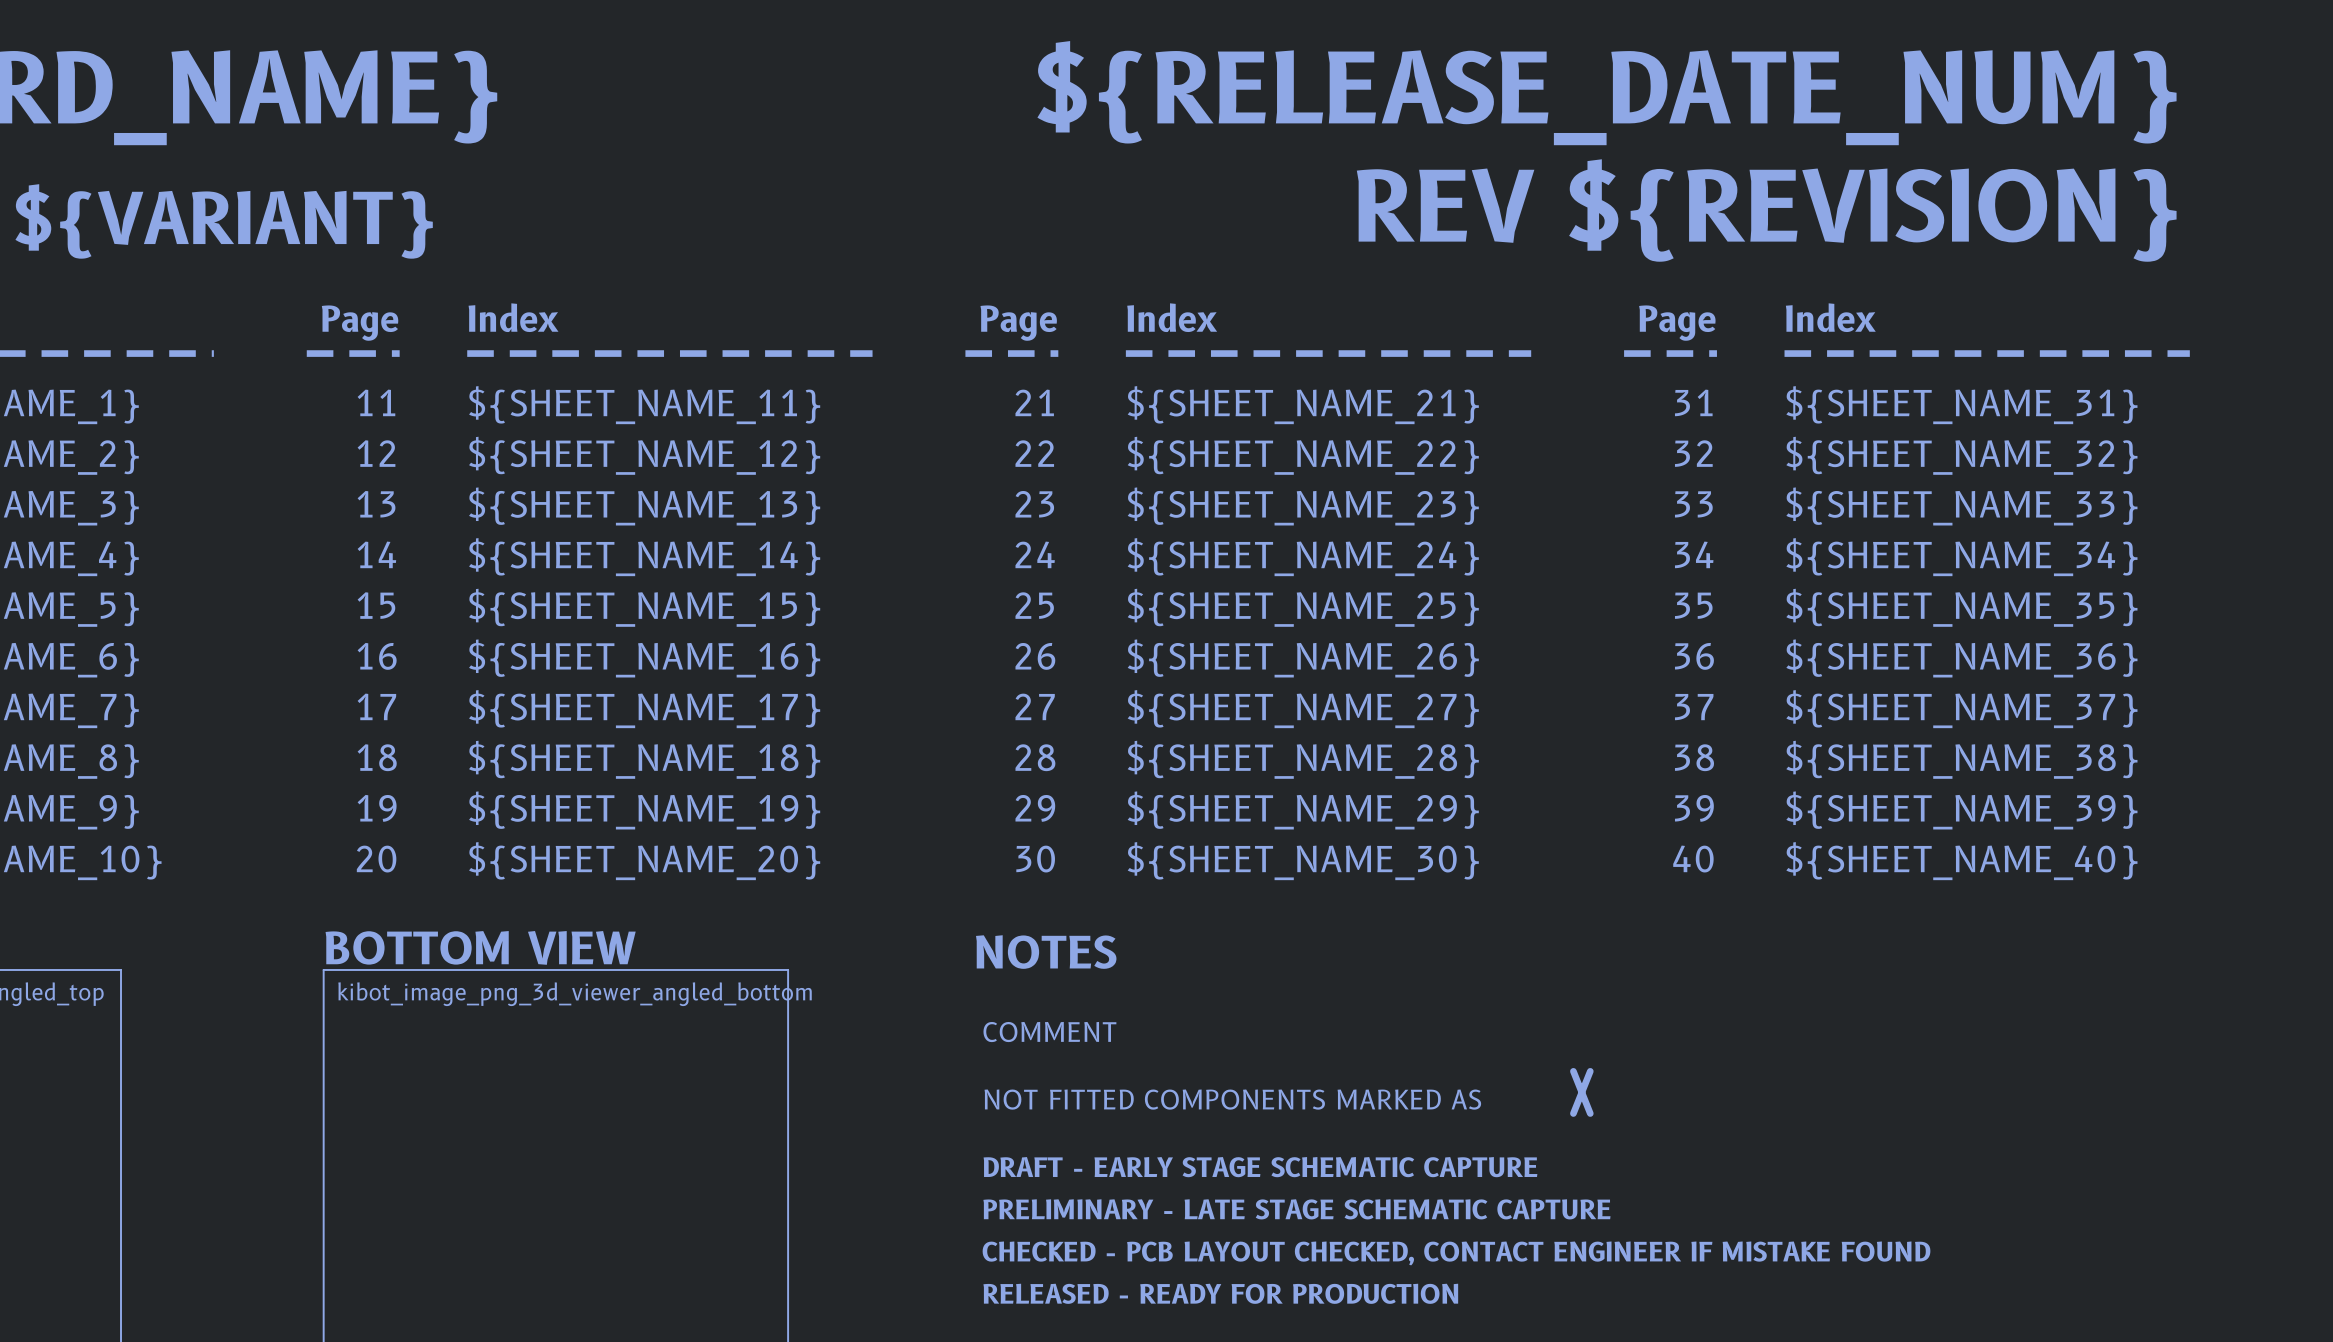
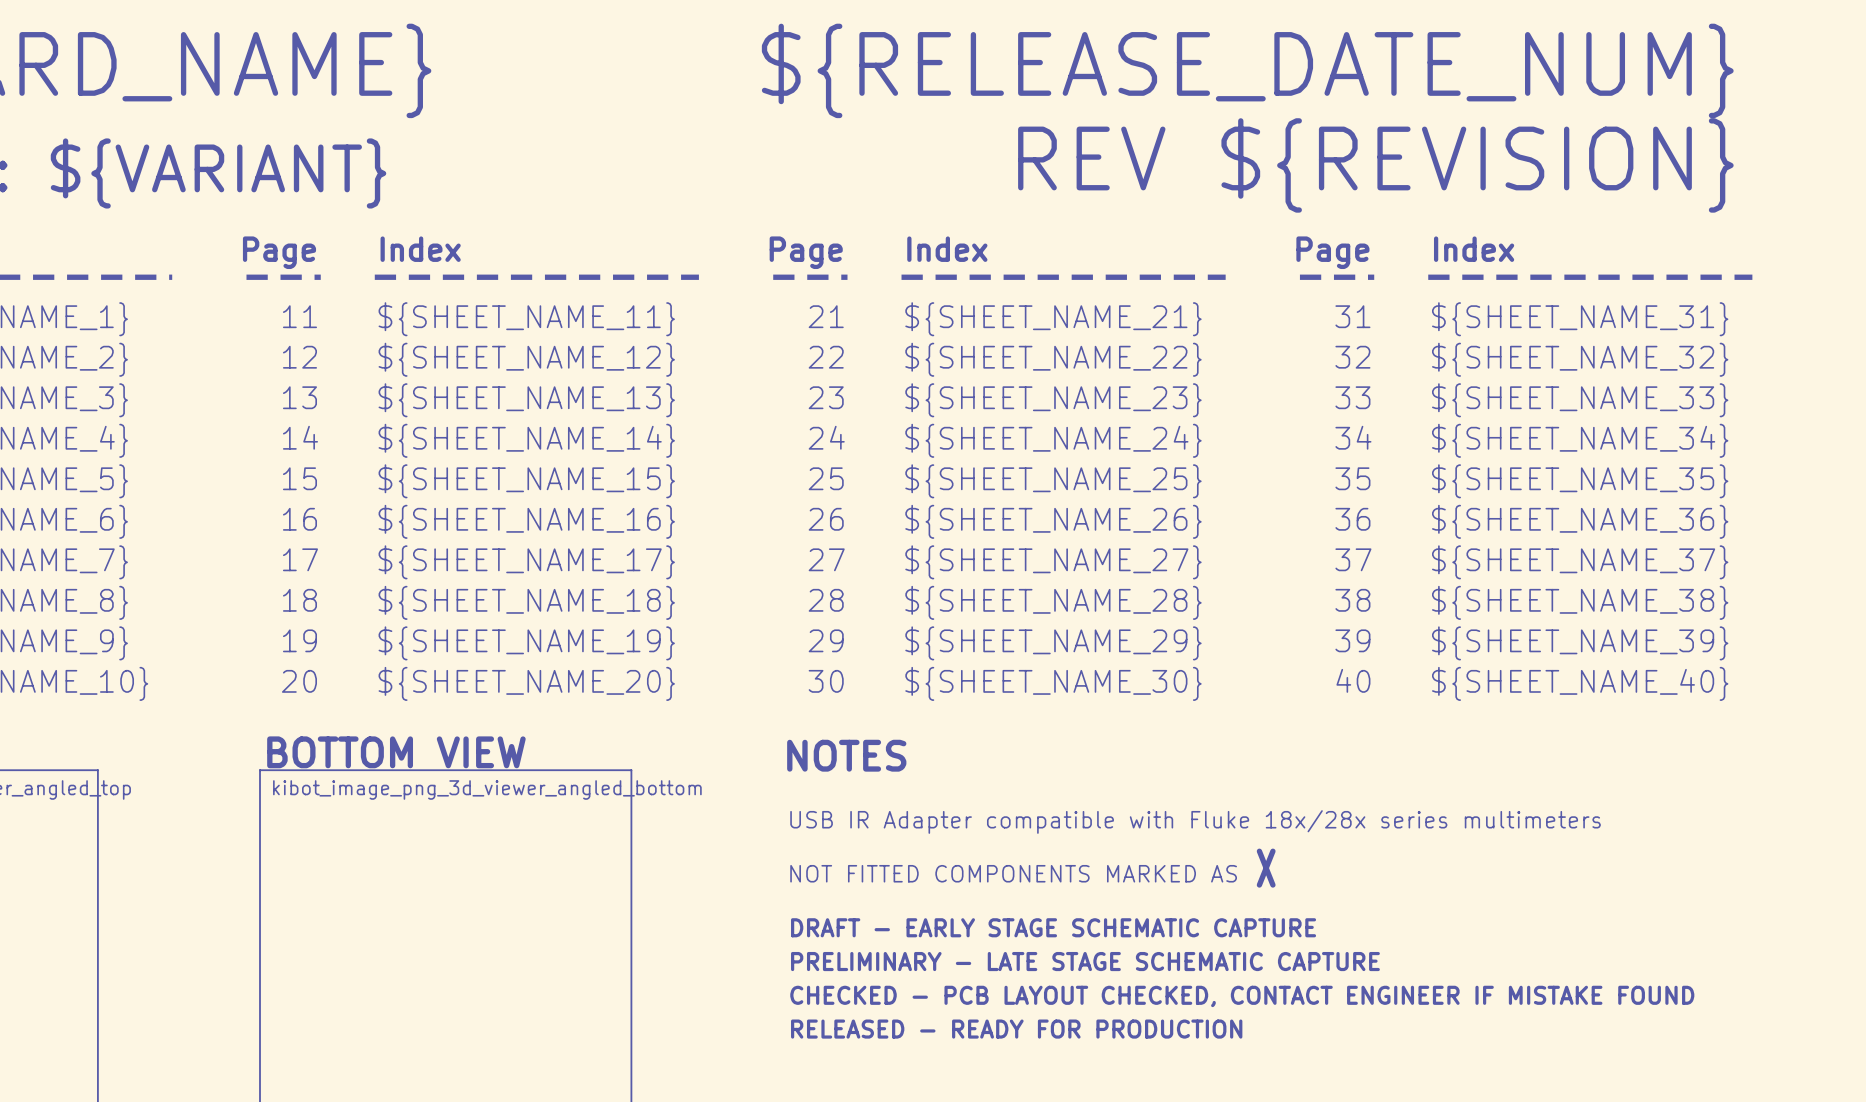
text: COMMENT (1049, 1032) -> USB IR Adapter compatible with Fluke 18x/28x series multimeters (1195, 822)

